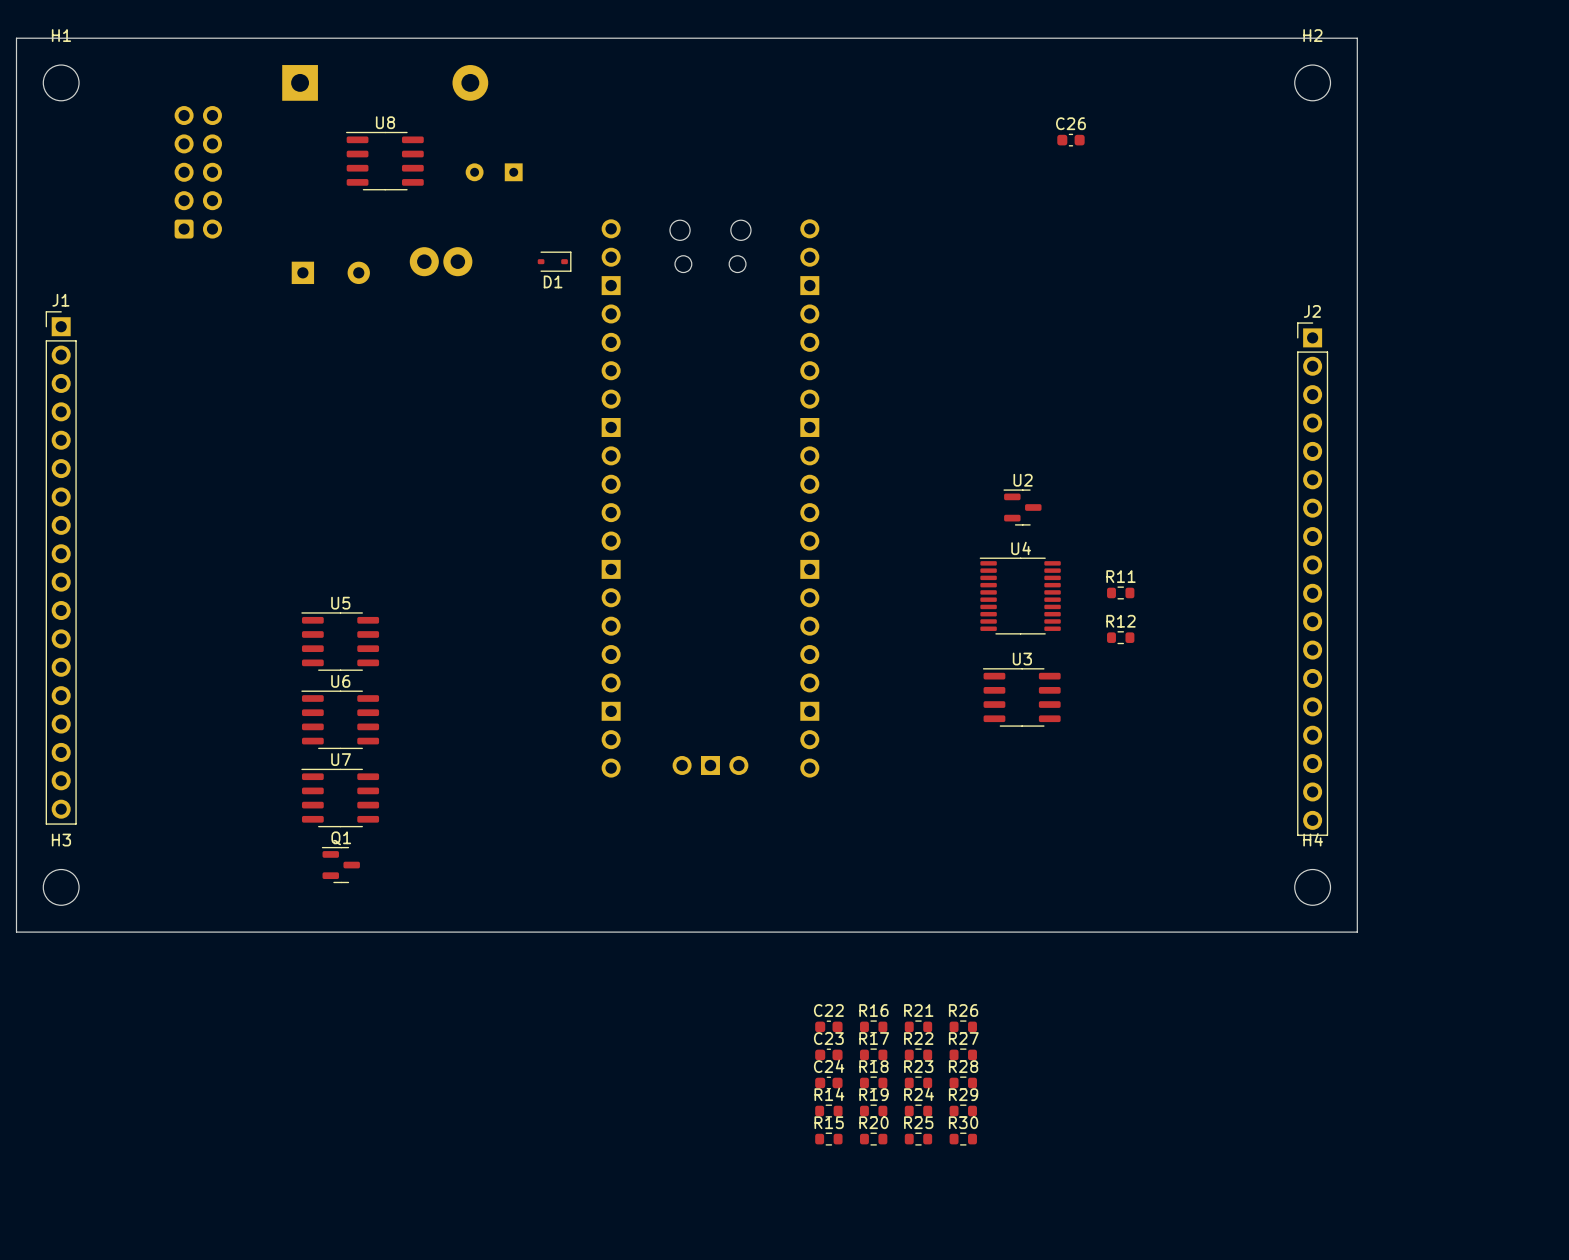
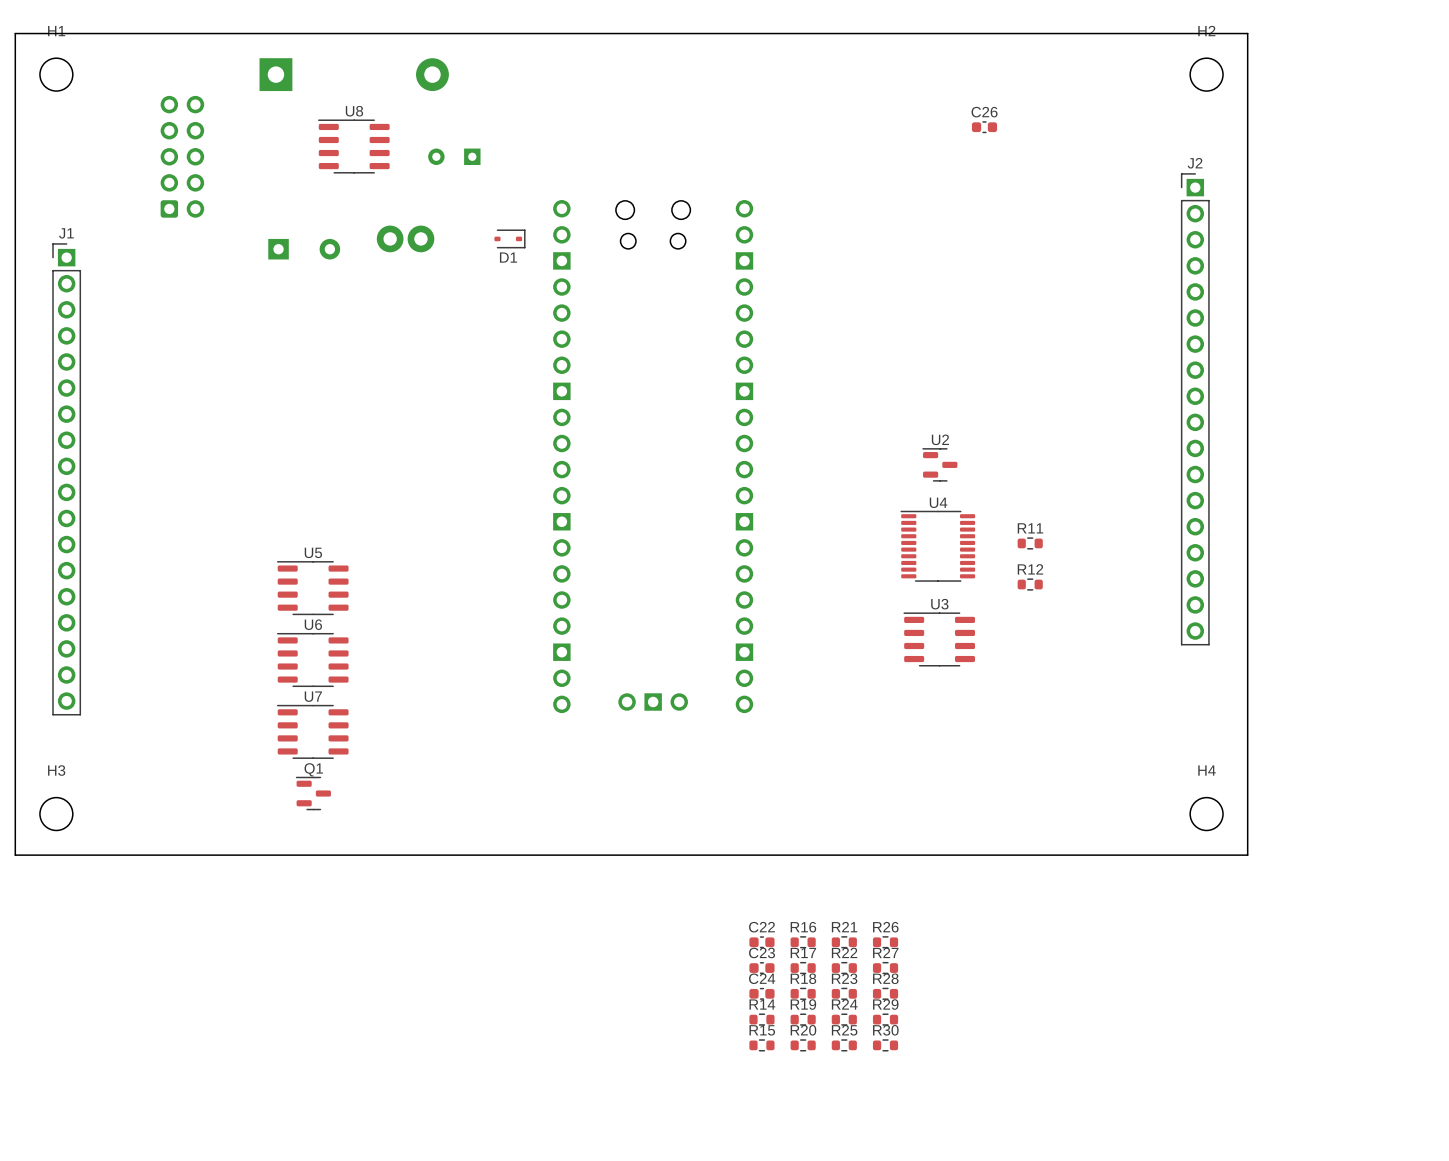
J1 position: (61, 567) -> (66, 479)
J2 position: (1312, 579) -> (1195, 409)

